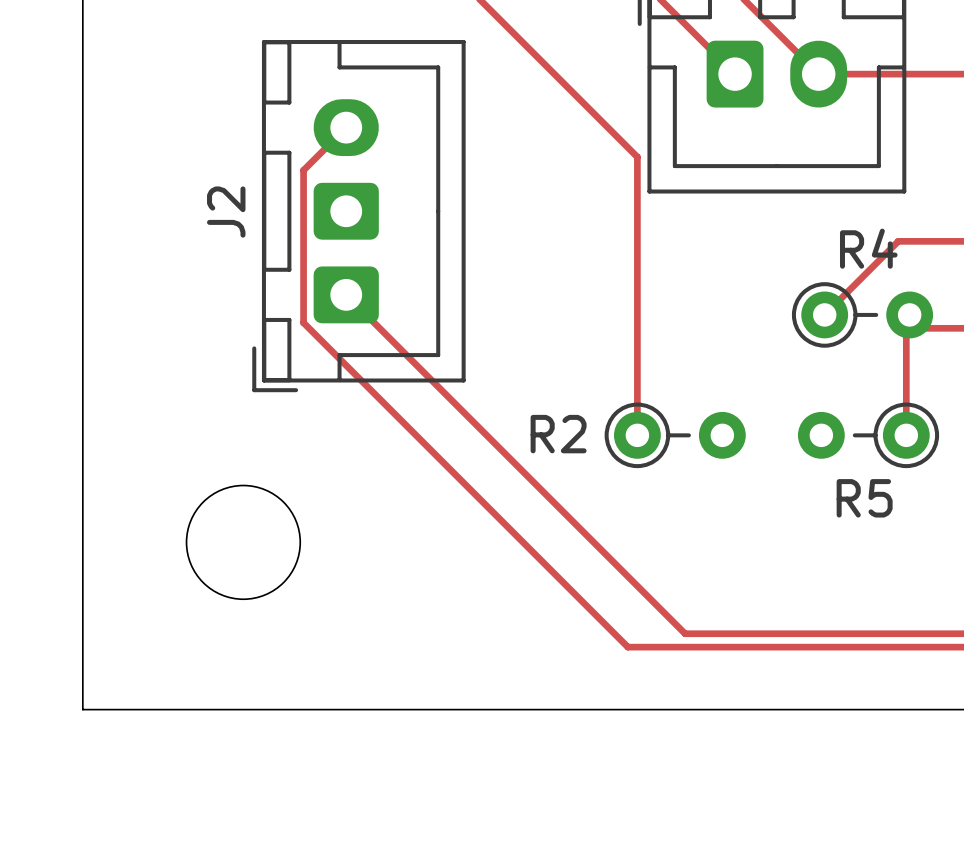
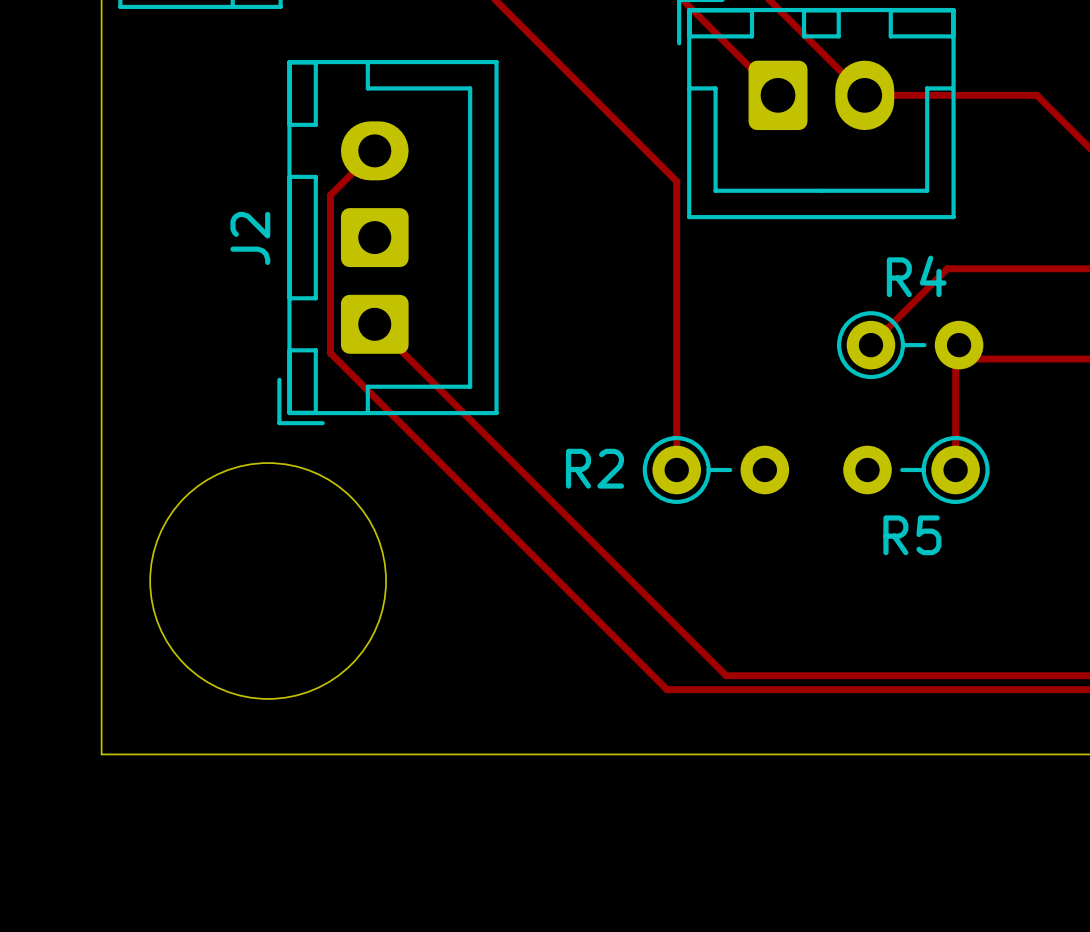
round board edge size: [185, 484, 302, 601] -> [149, 462, 387, 700]

